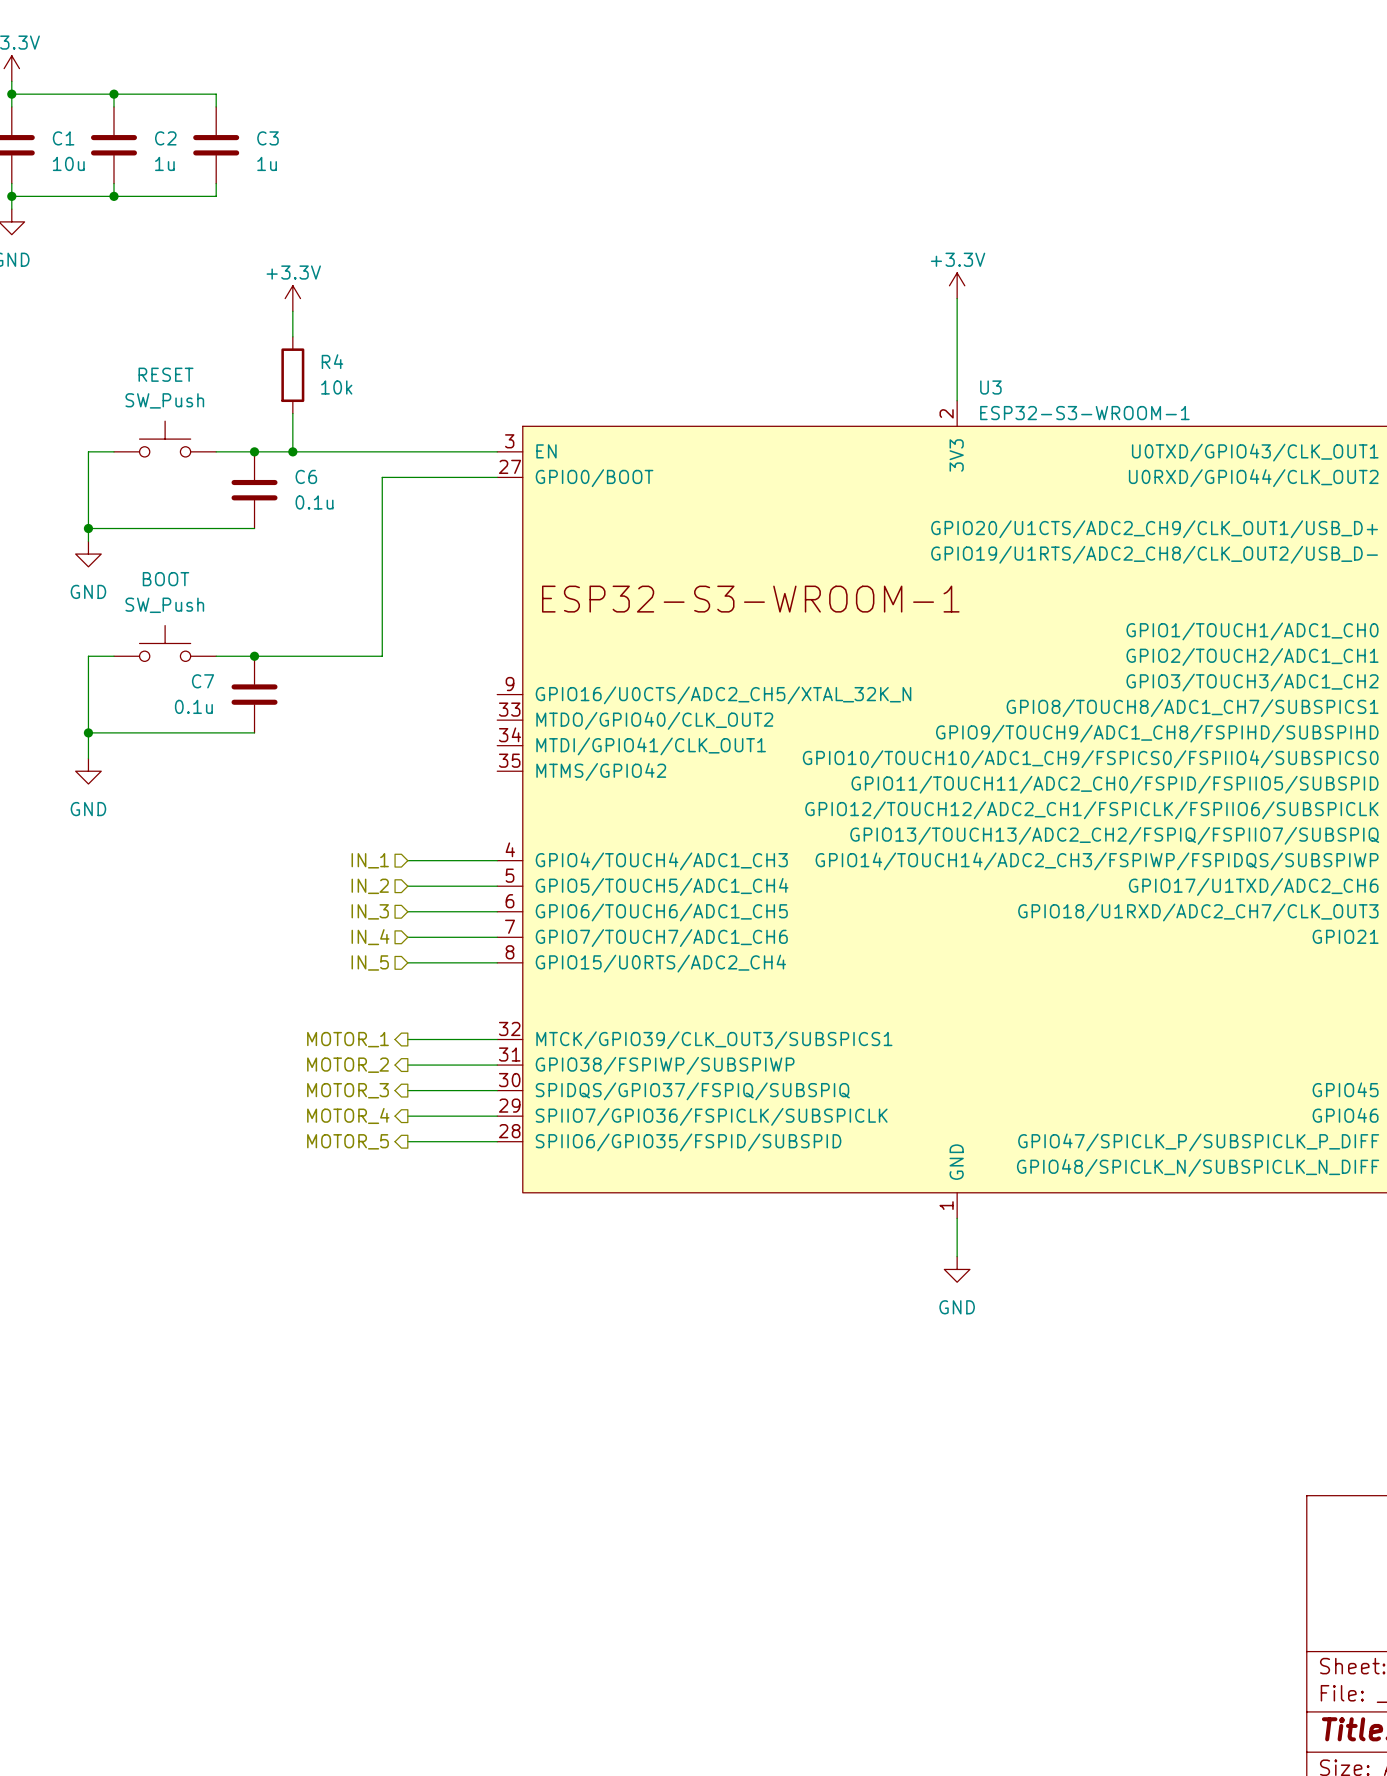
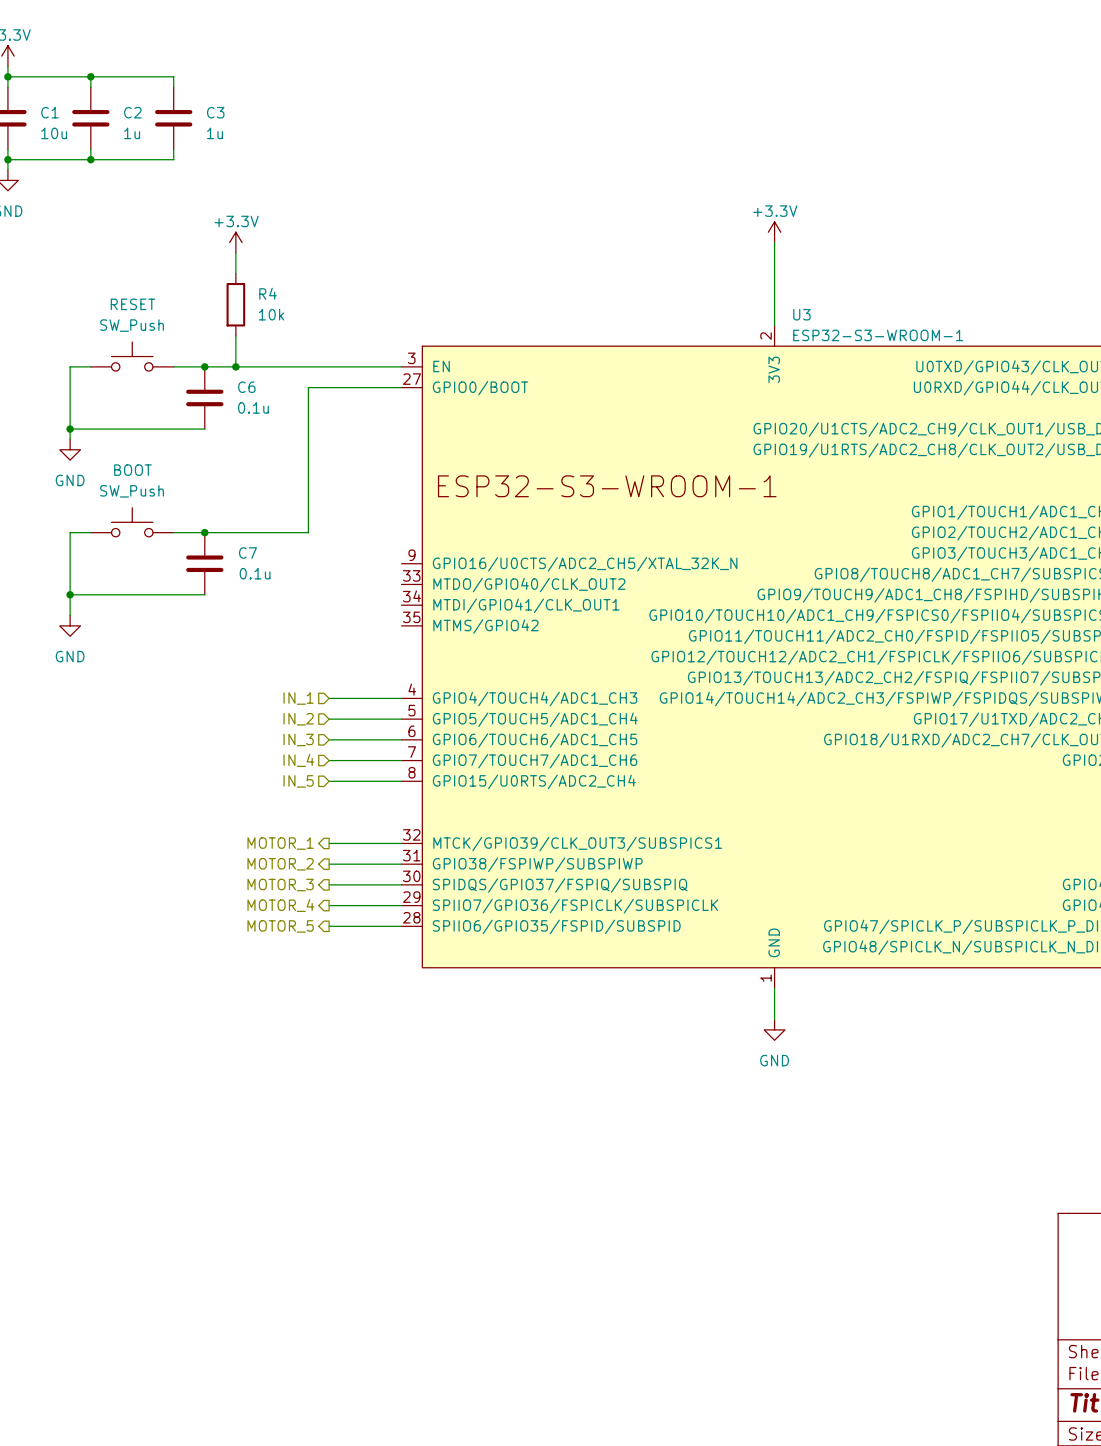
C7 name position: C7 (203, 681) -> C7 (247, 552)
C7 value position: 0.1u (193, 706) -> 0.1u (255, 573)

